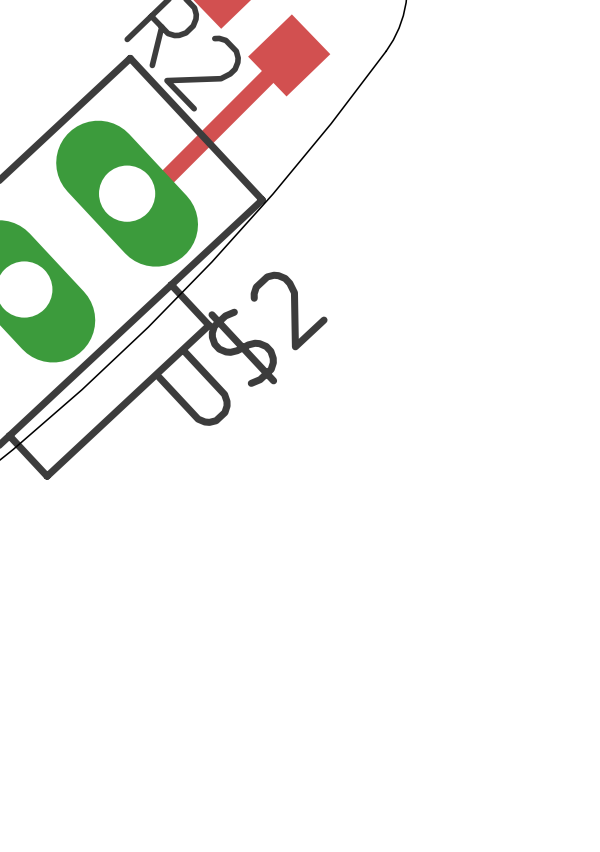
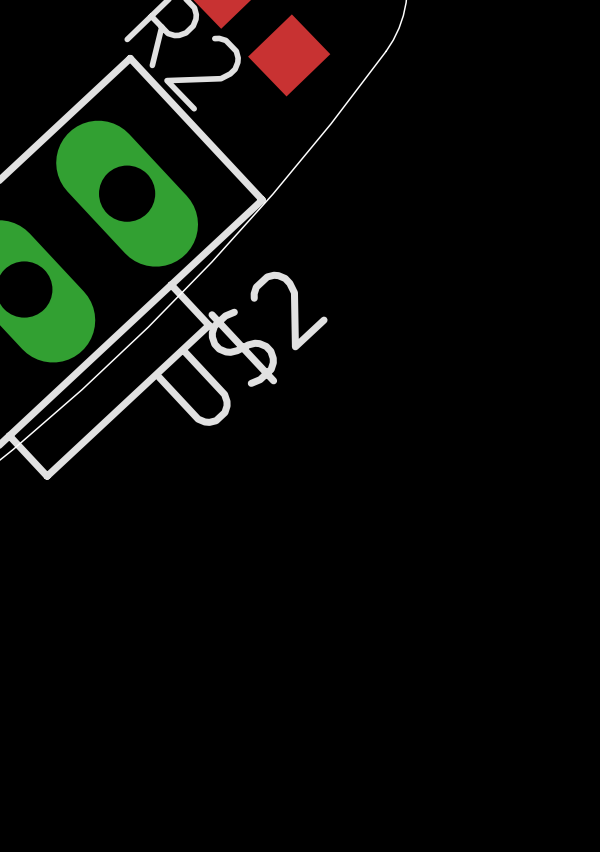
track: (289, 55) (150, 193) (127, 193) -> none

